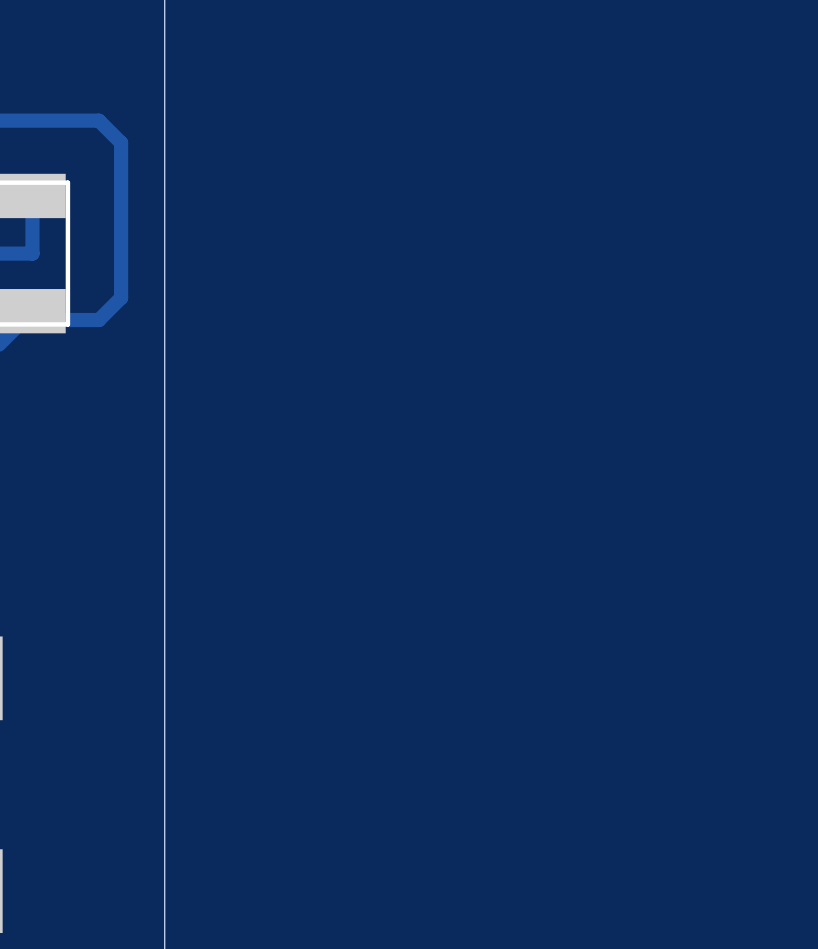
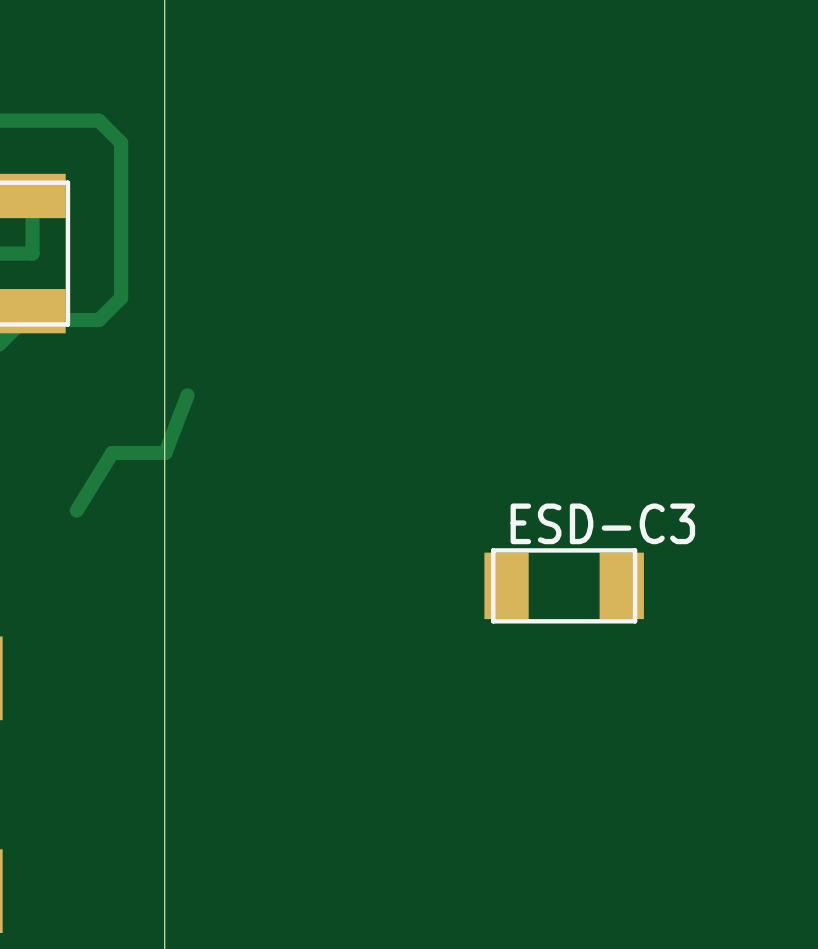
track: none -> (187, 395) (165, 452) (112, 452) (76, 510)
ESD-C3: none -> (564, 585)

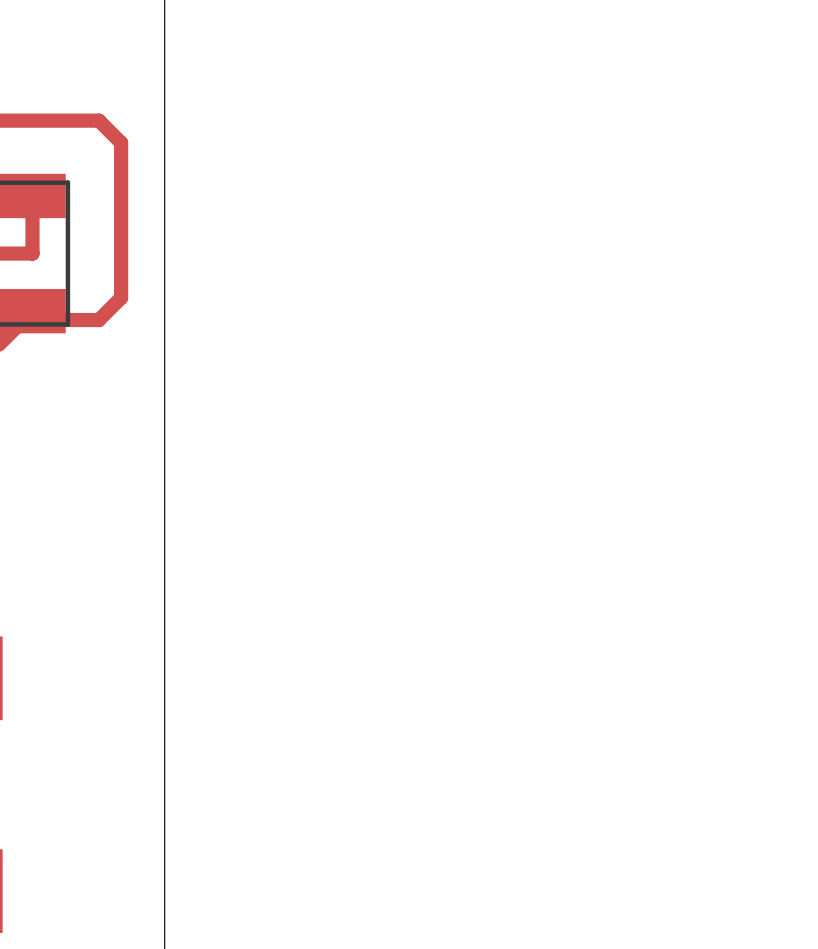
track: (187, 395) (165, 452) (112, 452) (76, 510) -> none
ESD-C3: (564, 585) -> none

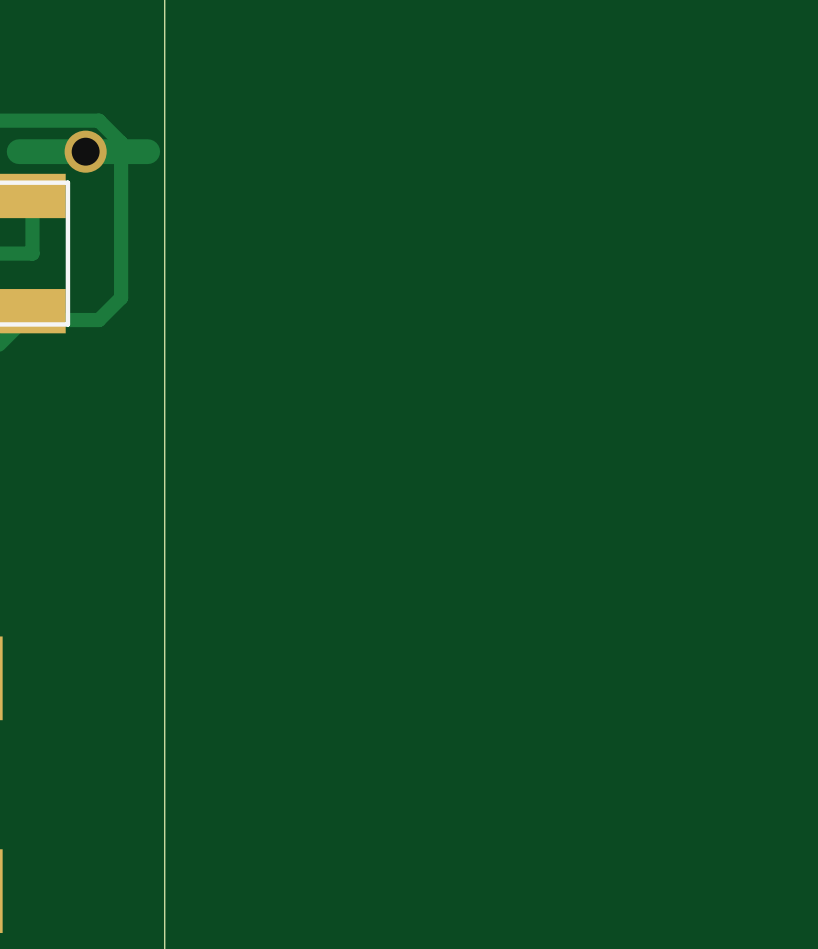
track: none -> (19, 151) (147, 151)
via: none -> (85, 151)

